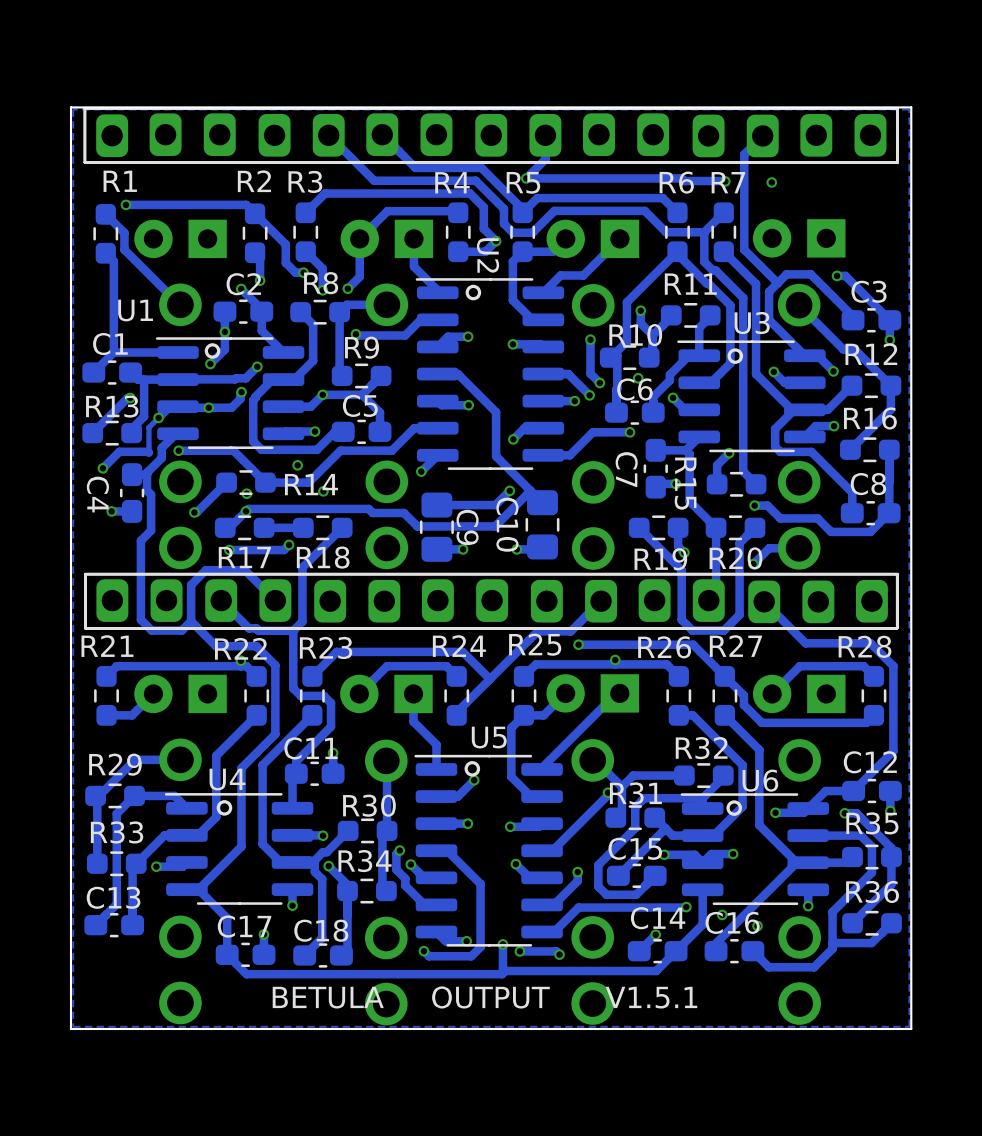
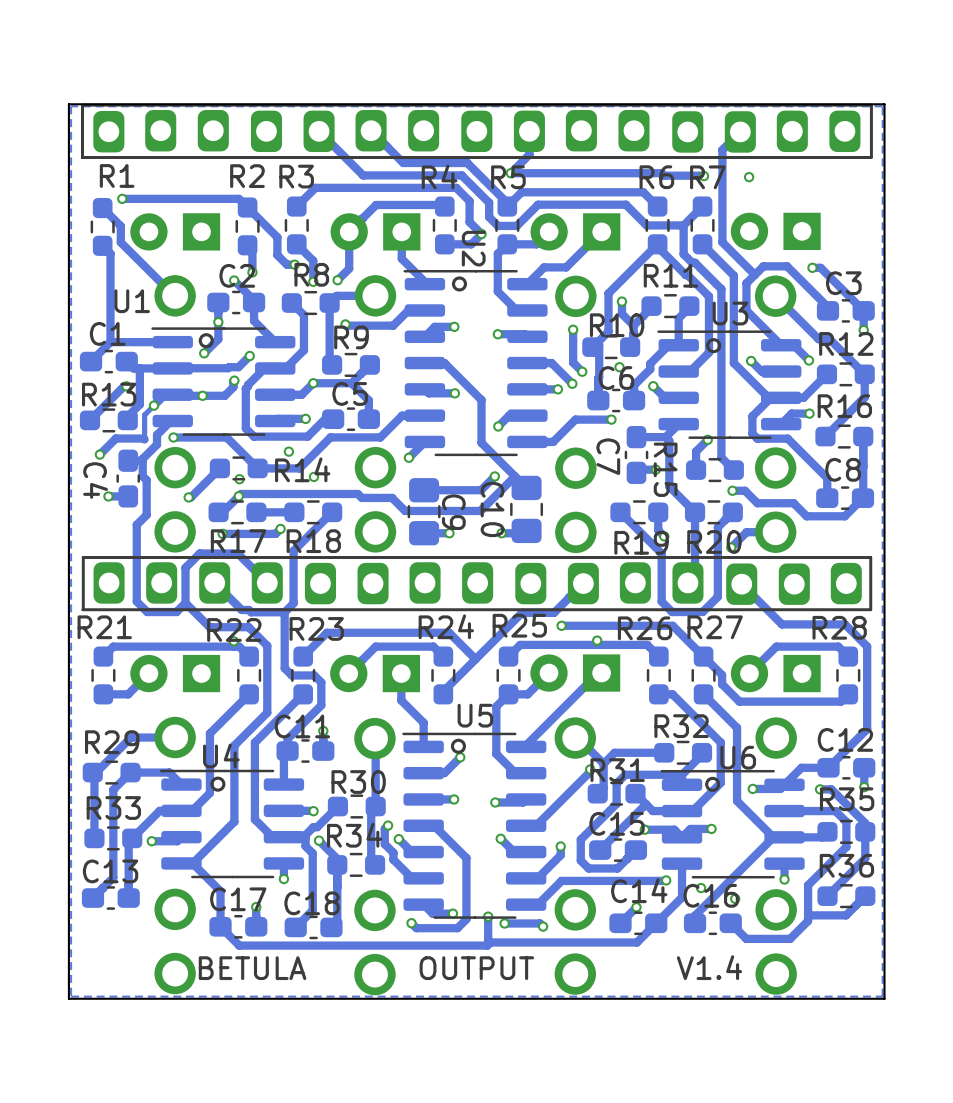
text: BETULA OUTPUT V1.5.1 (484, 997) -> BETULA OUTPUT V1.4 (470, 967)

